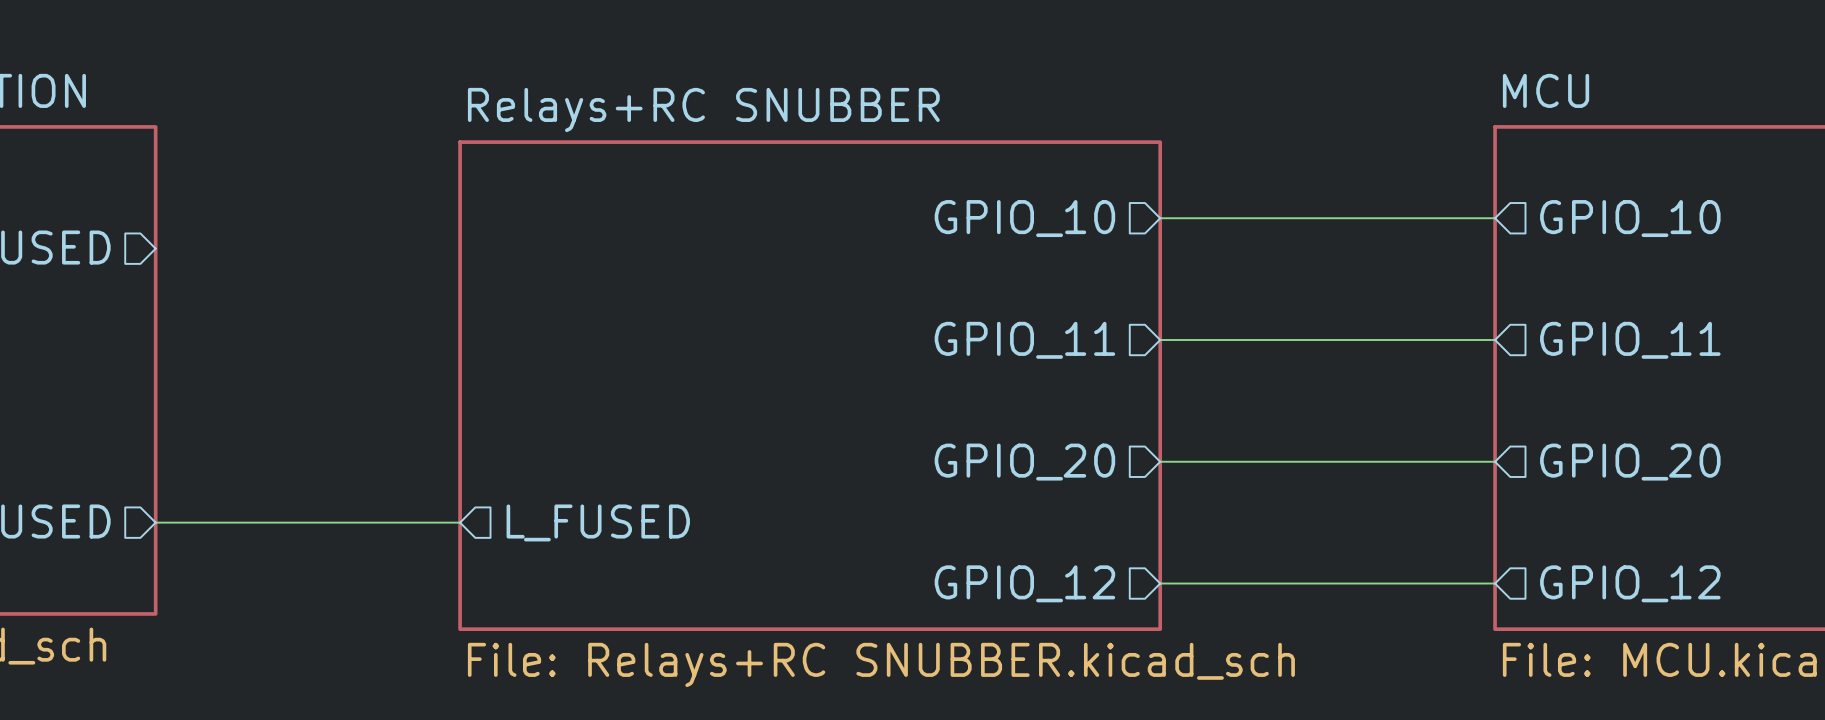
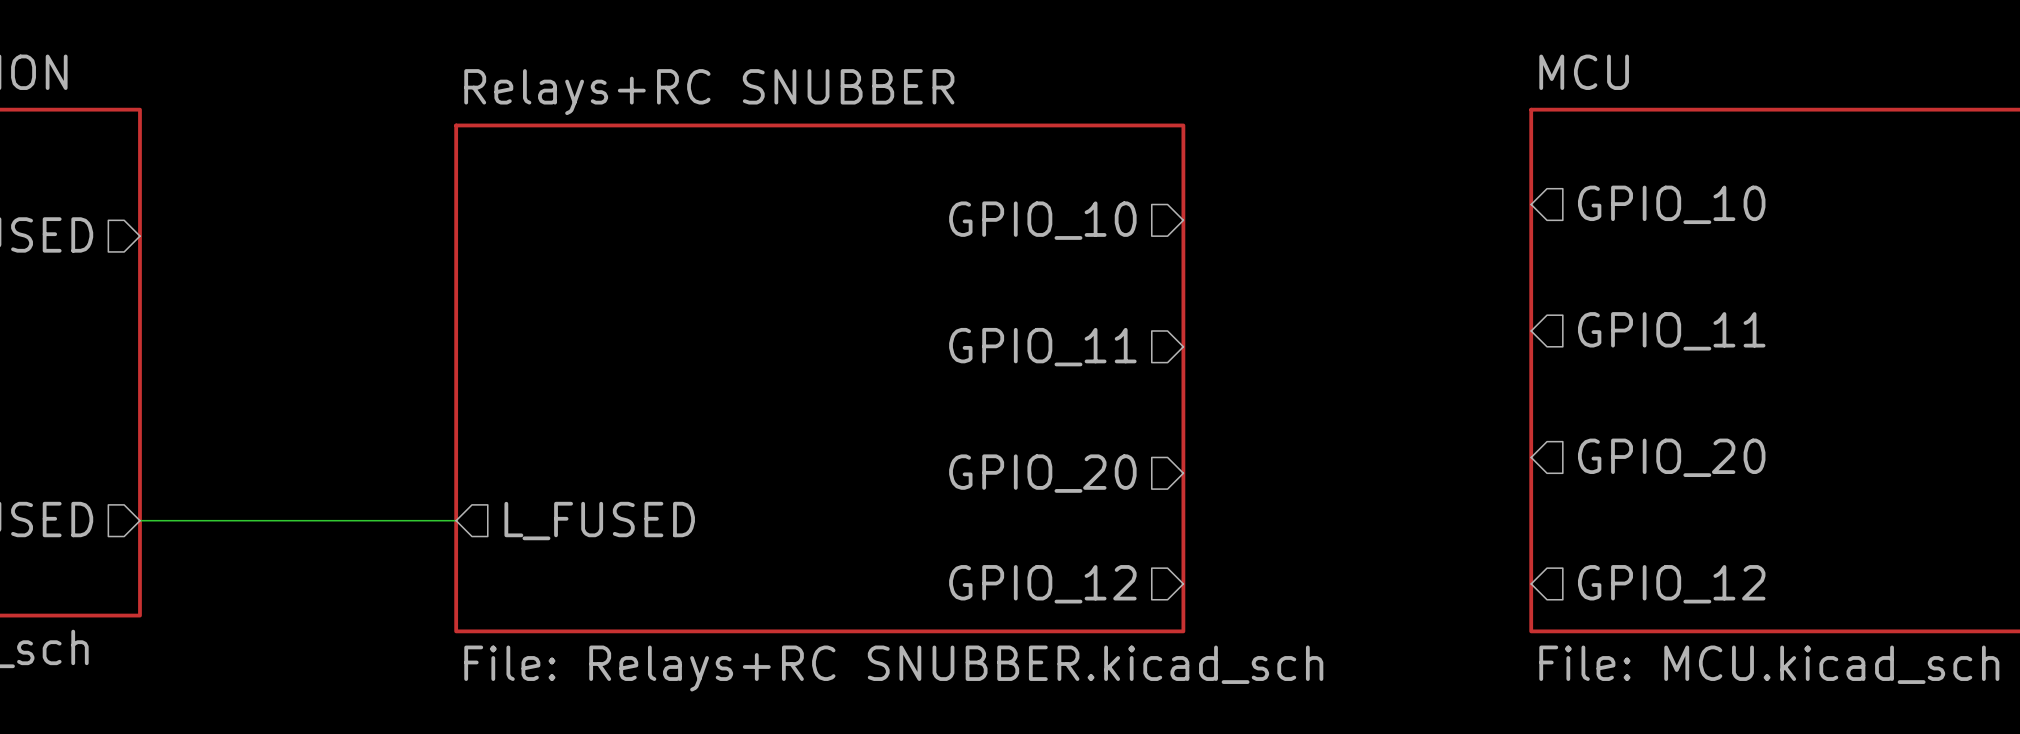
sheet pin position: GPIO_10 (1024, 218) -> GPIO_10 (1042, 220)
wire: (1160, 218) (1495, 218) -> none
wire: (1160, 339) (1495, 339) -> none
sheet pin position: GPIO_11 (1024, 340) -> GPIO_11 (1042, 347)
wire: (1160, 461) (1495, 461) -> none
sheet pin position: GPIO_20 (1024, 462) -> GPIO_20 (1042, 473)
wire: (1160, 583) (1495, 583) -> none

